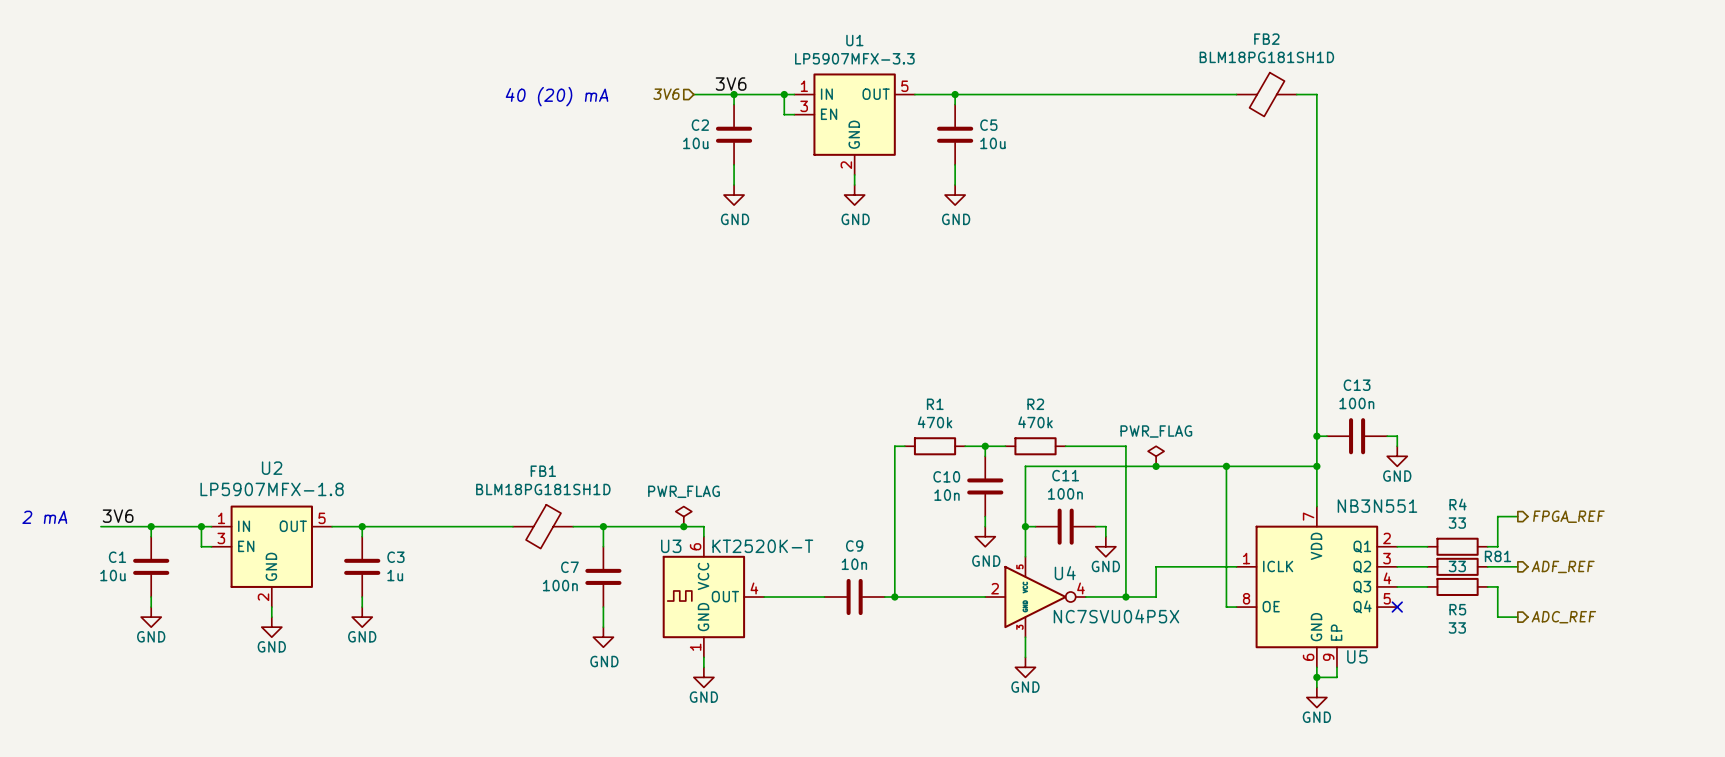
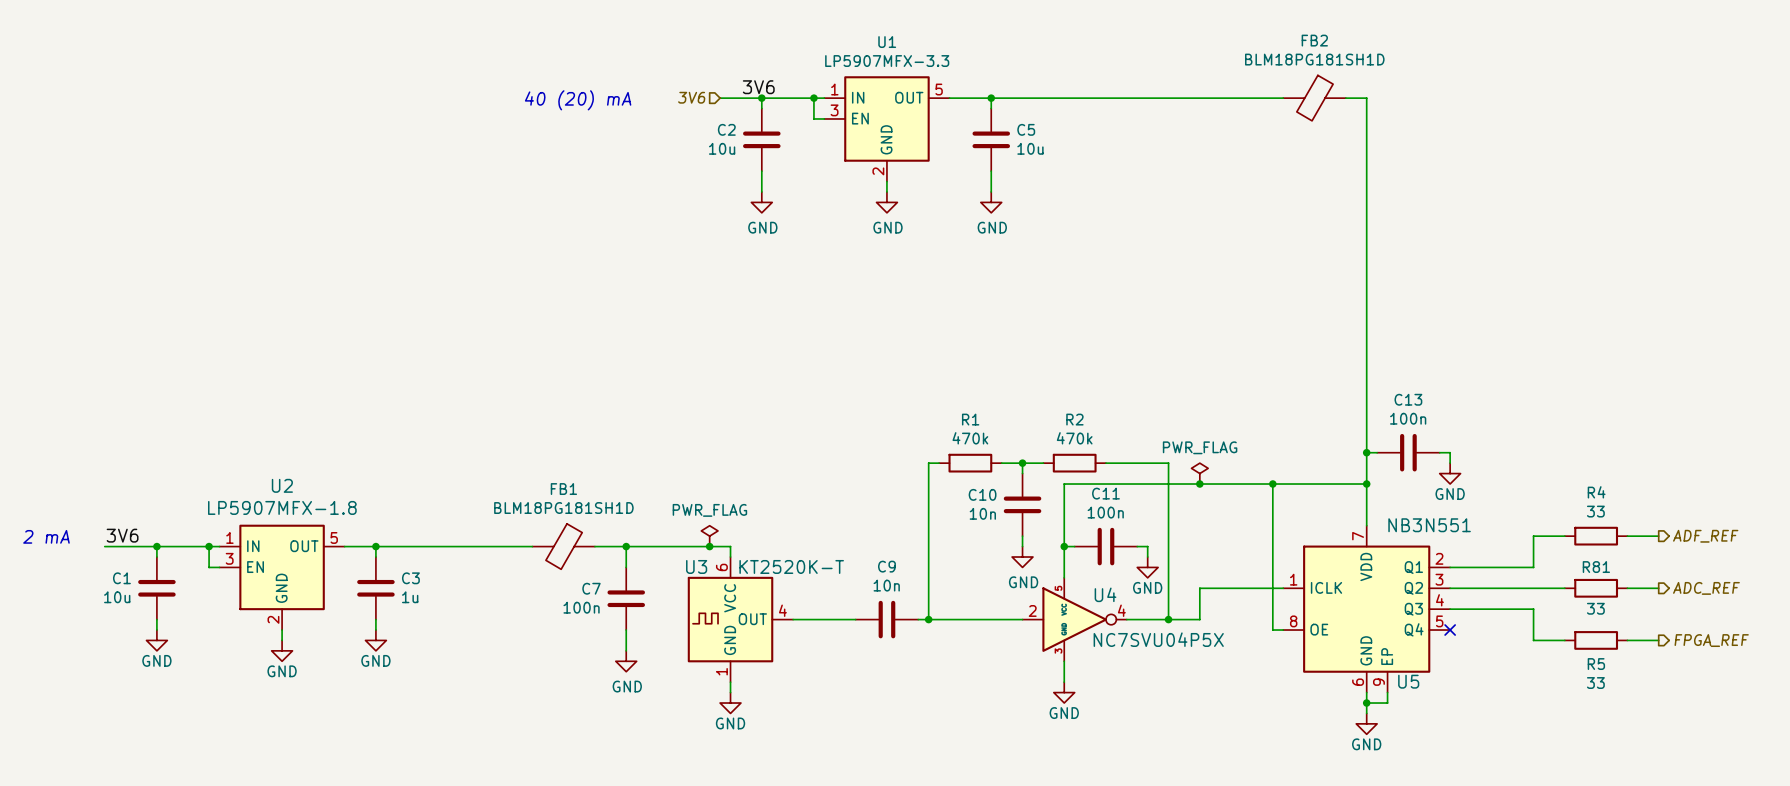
wire: (1497, 516) (1497, 546) (1487, 546) -> (1554, 536) (1533, 536) (1533, 567) (1481, 567)
wire: none -> (1627, 536) (1658, 536)
hierarchical label position: FPGA_REF (1568, 516) -> FPGA_REF (1711, 640)
R4 position: (1457, 546) -> (1596, 536)
R81 name position: R81 (1498, 556) -> R81 (1596, 567)
wire: none -> (1481, 588) (1543, 588)
R81 position: (1457, 566) -> (1596, 588)
R81 value position: 33 (1457, 566) -> 33 (1595, 608)
hierarchical label position: ADF_REF (1563, 566) -> ADF_REF (1705, 536)
wire: none -> (1627, 588) (1658, 588)
R5 position: (1457, 586) -> (1596, 640)
wire: (1487, 586) (1497, 586) (1497, 617) -> (1481, 609) (1533, 609) (1533, 640) (1554, 640)
hierarchical label position: ADC_REF (1563, 617) -> ADC_REF (1706, 588)
wire: none -> (1627, 640) (1658, 640)

